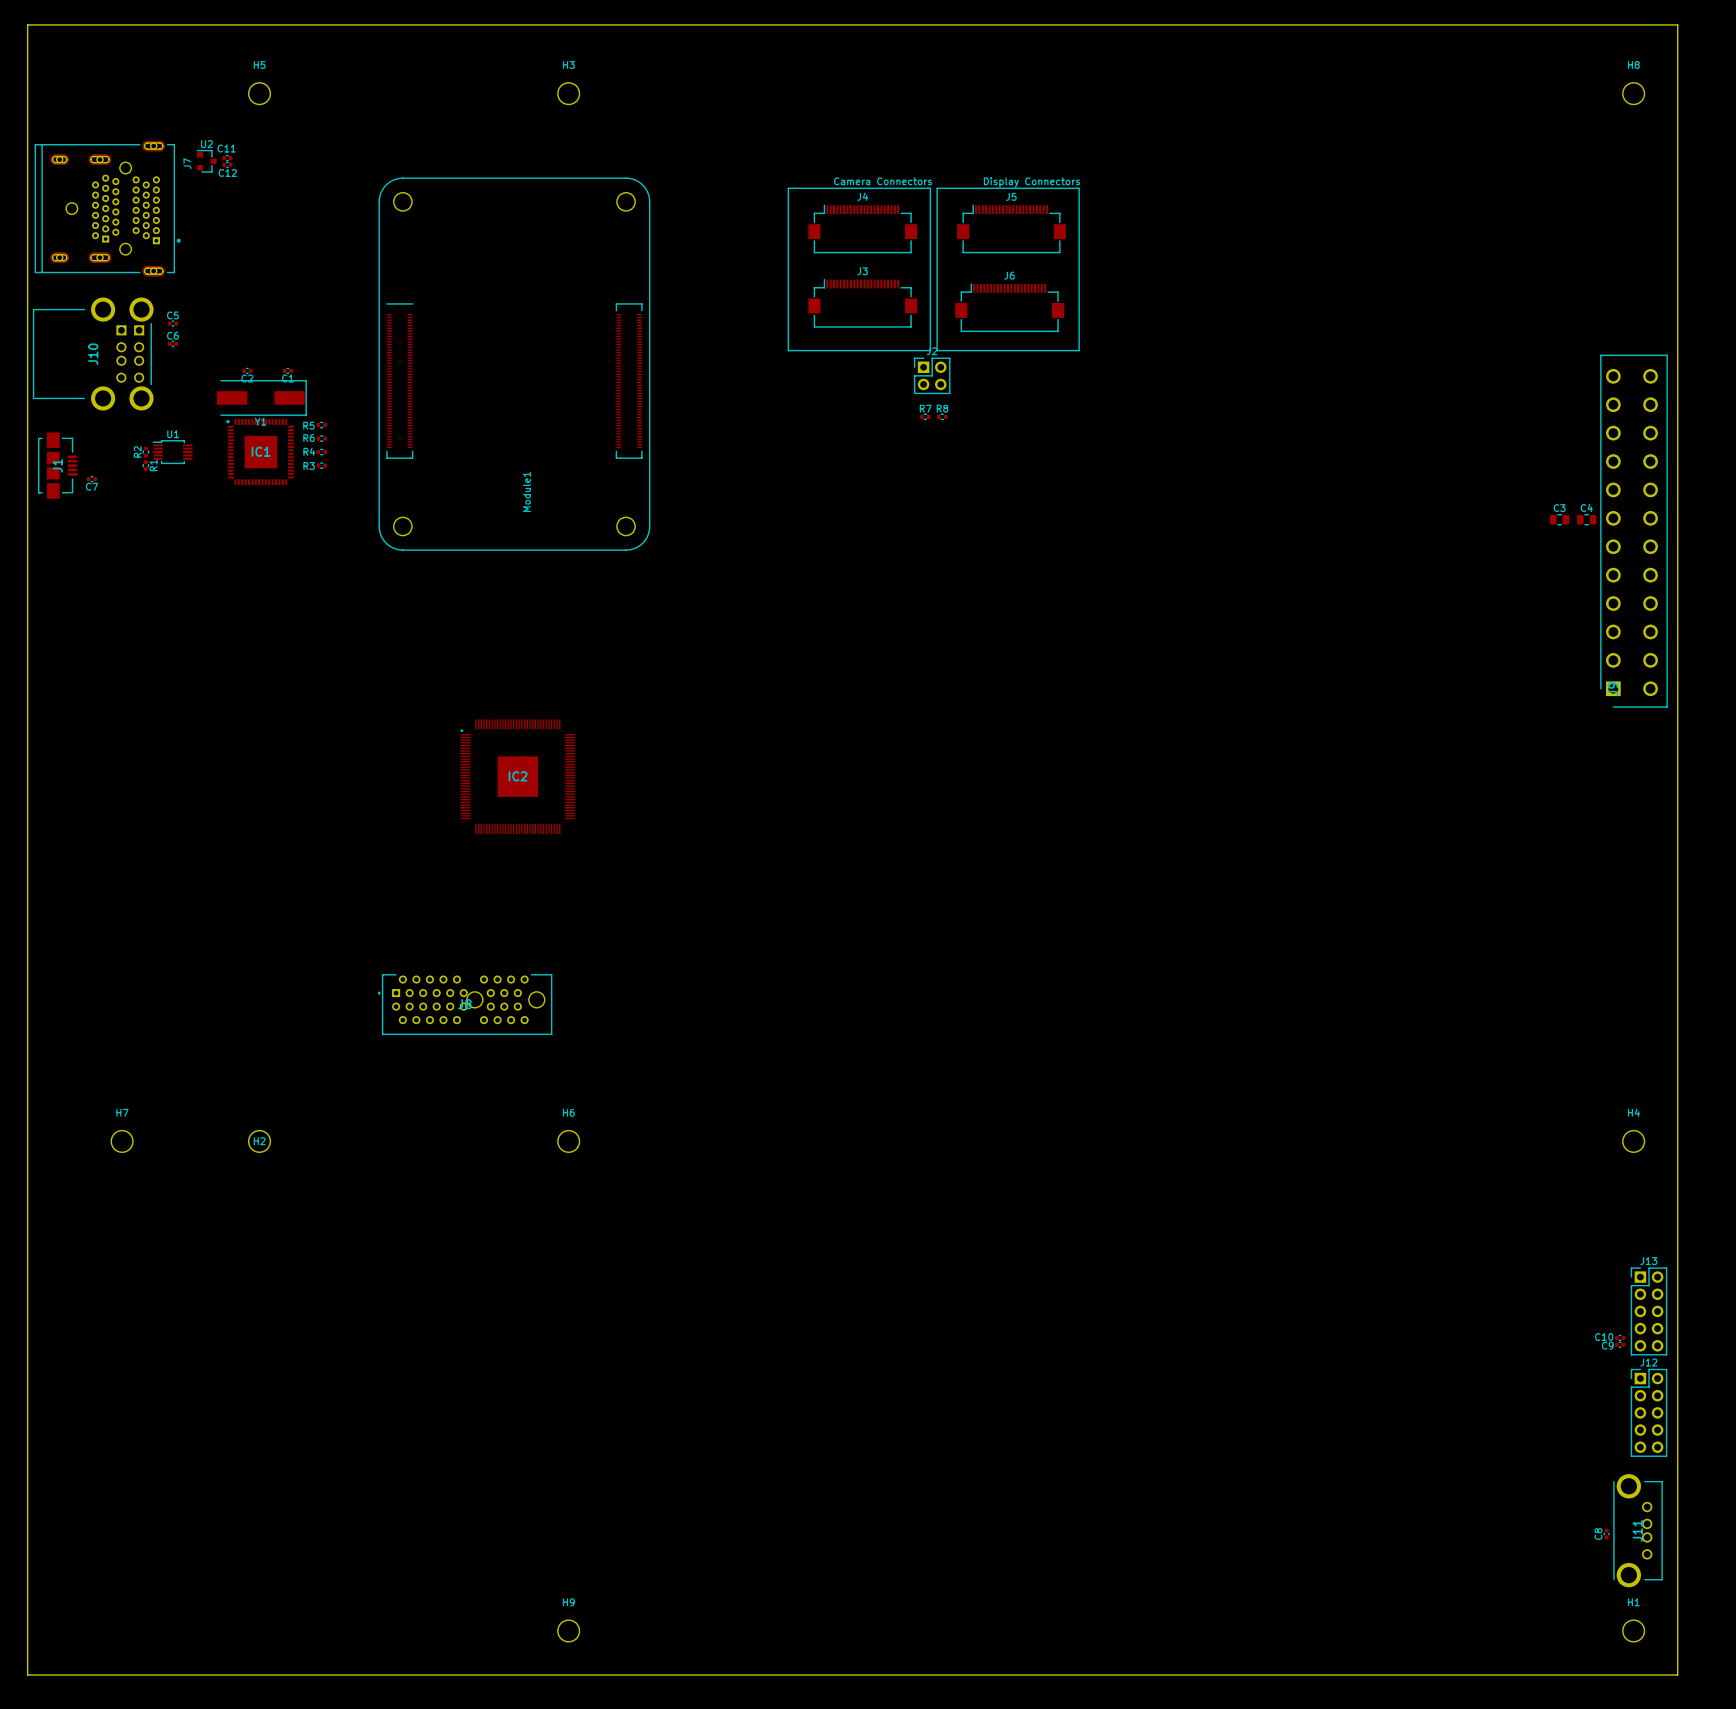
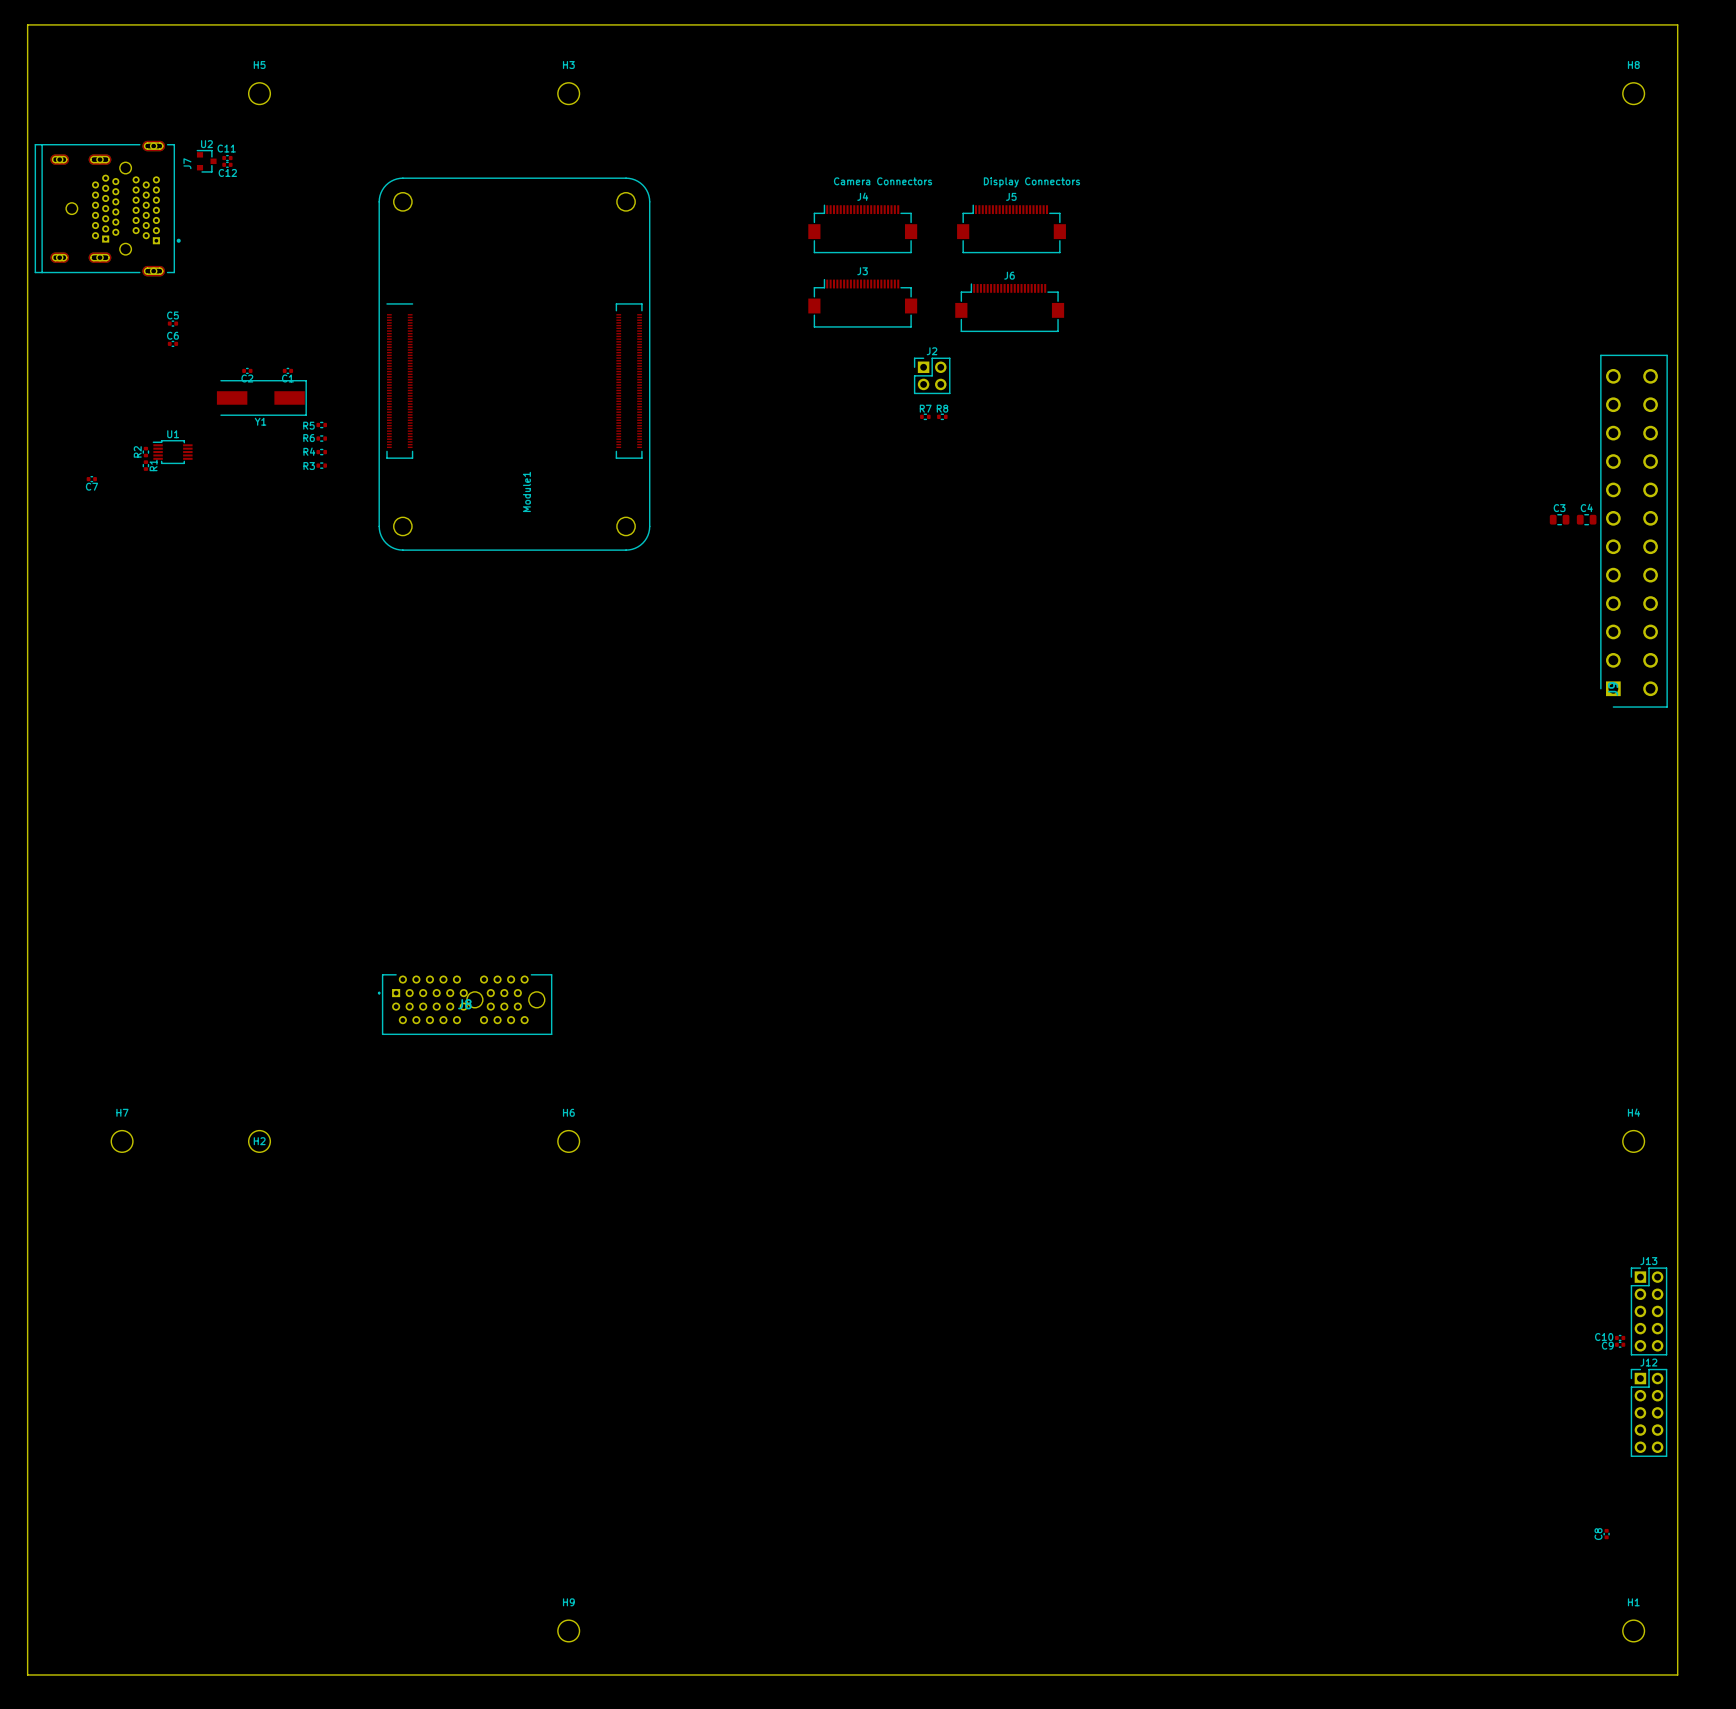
line: (788, 188) (930, 188) (930, 350) (788, 350) (788, 188) -> none
line: (937, 188) (1079, 188) (1079, 350) (937, 350) (937, 188) -> none
J10: (93, 354) -> none
IC1: (260, 452) -> none
J1: (57, 465) -> none
IC2: (517, 776) -> none
J11: (1638, 1530) -> none

